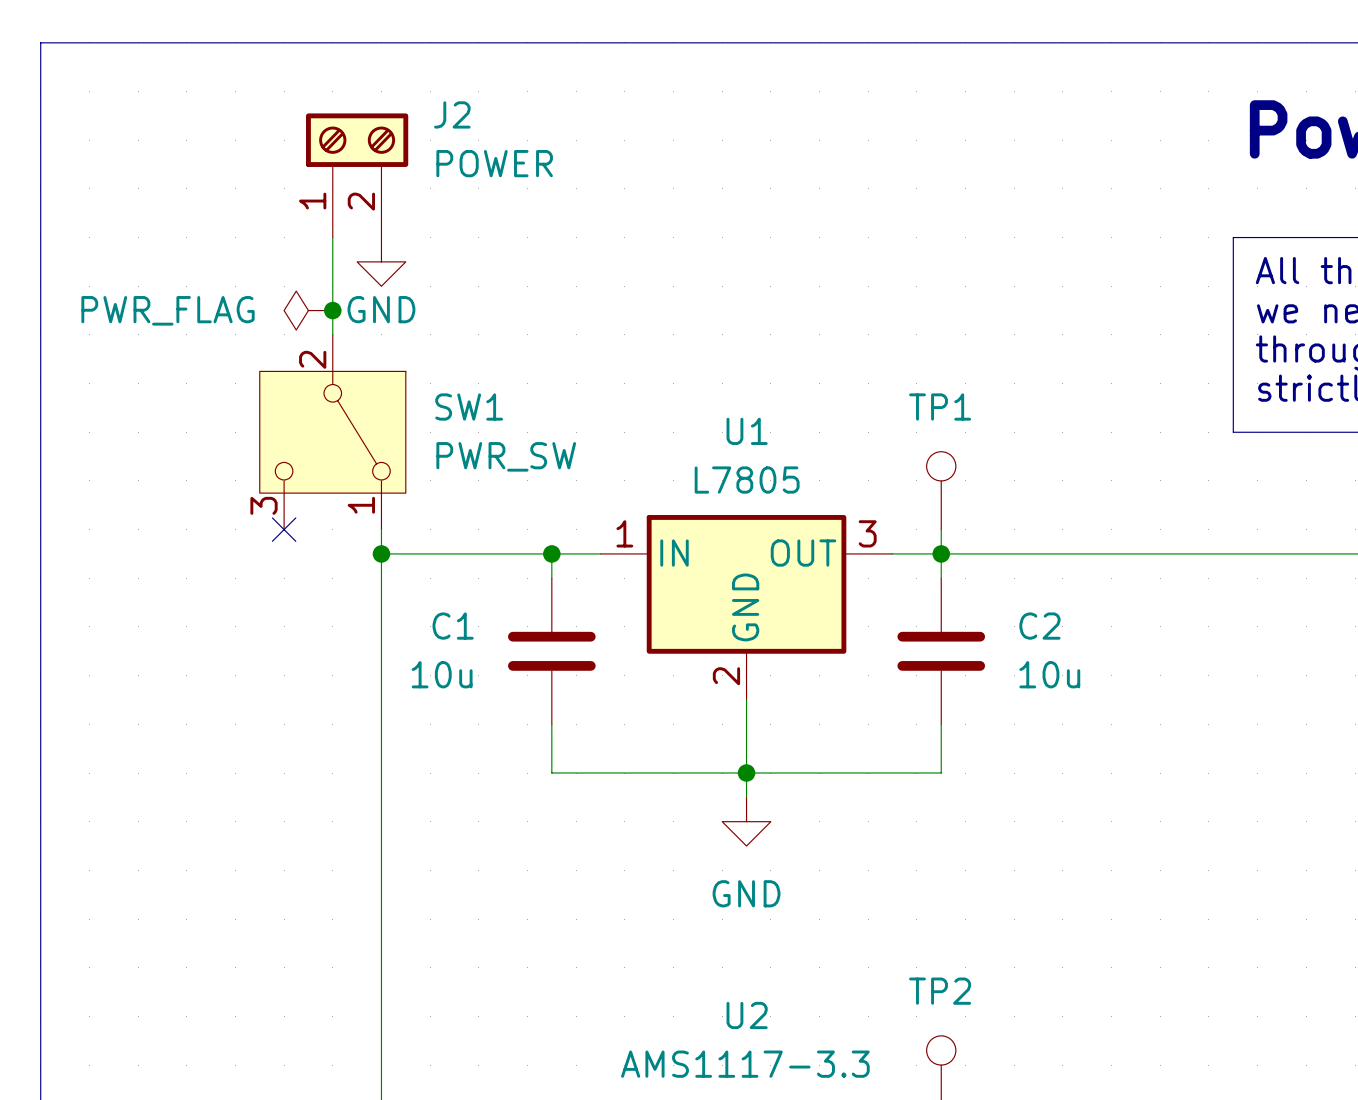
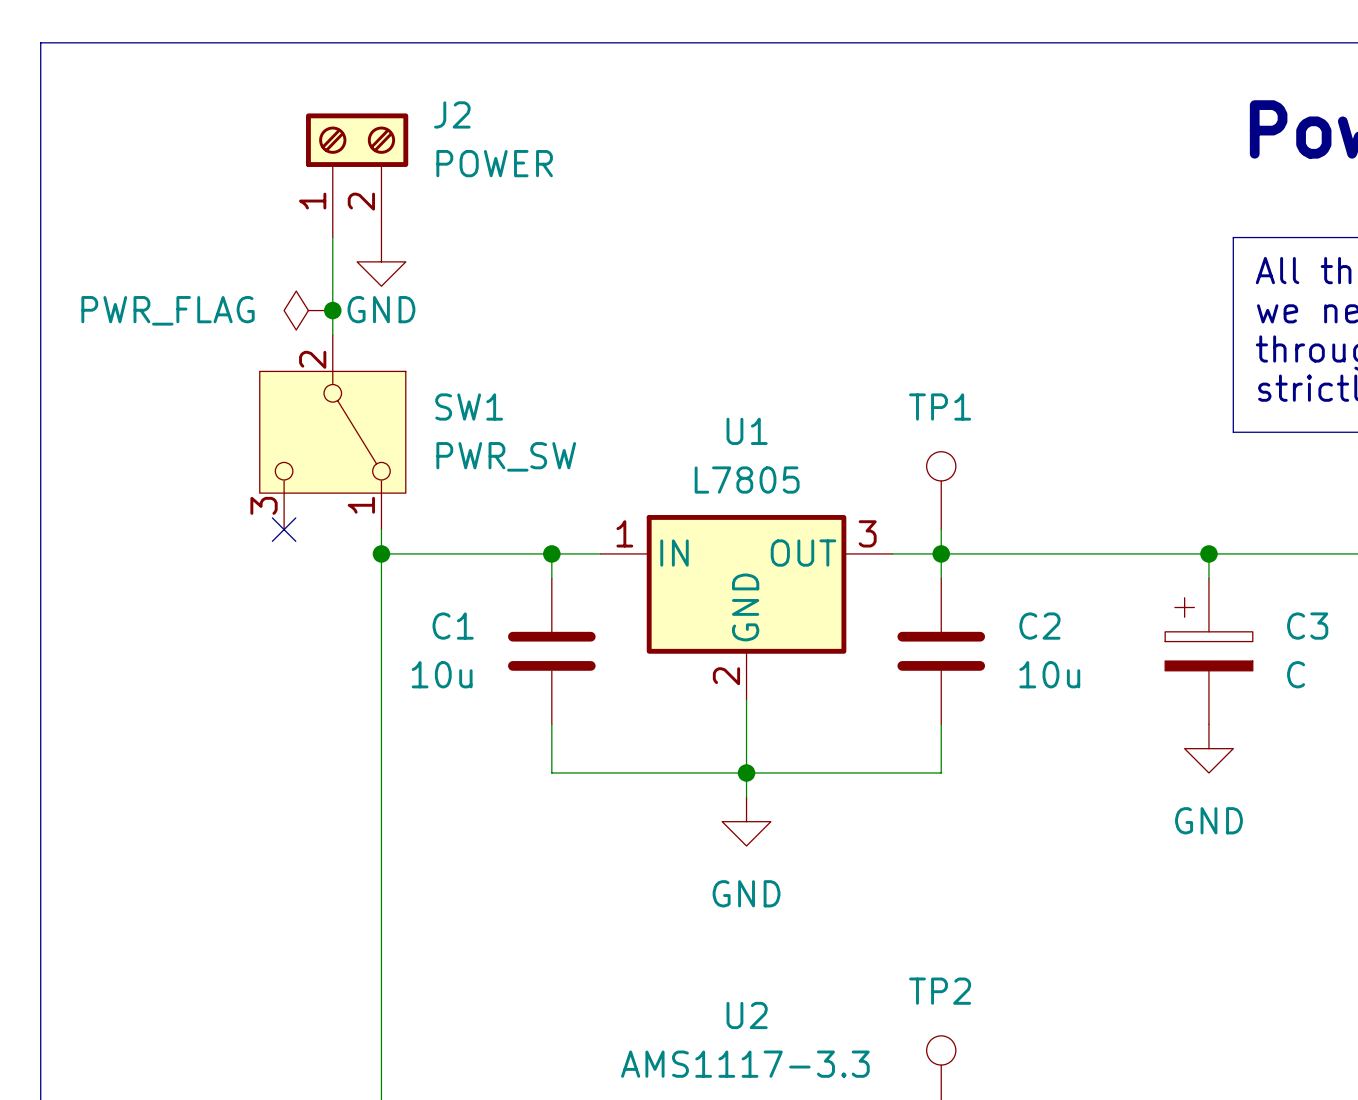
wire: none -> (1208, 553) (1208, 578)
junction: none -> (1208, 553)
C3: none -> C (1208, 651)
power symbol: none -> GND (1208, 748)

